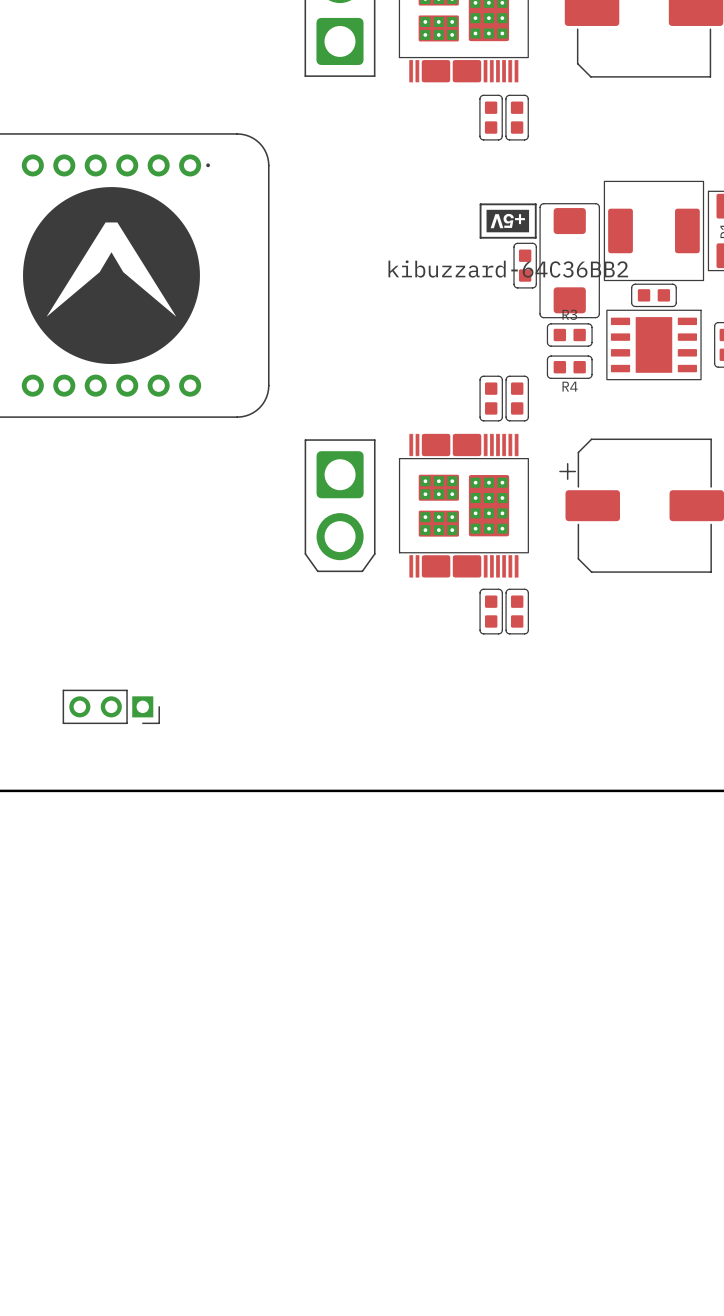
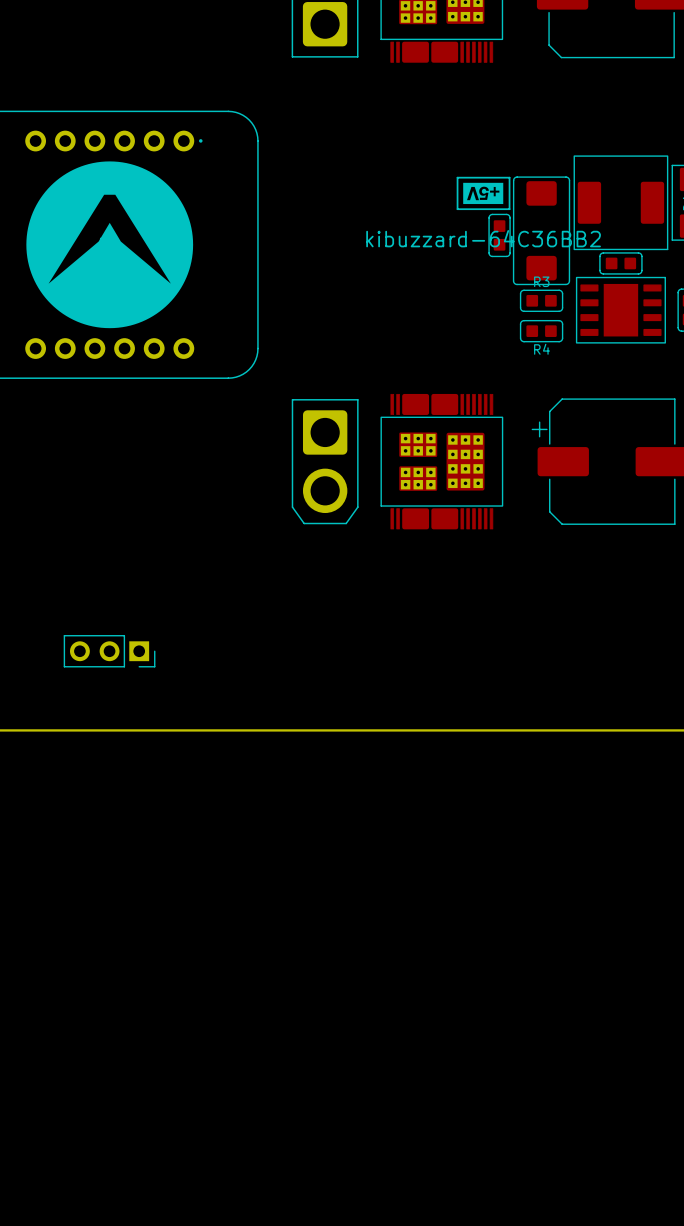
part: (491, 117) -> none
part: (517, 117) -> none
part: (491, 398) -> none
part: (517, 398) -> none
part: (491, 611) -> none
part: (517, 611) -> none

